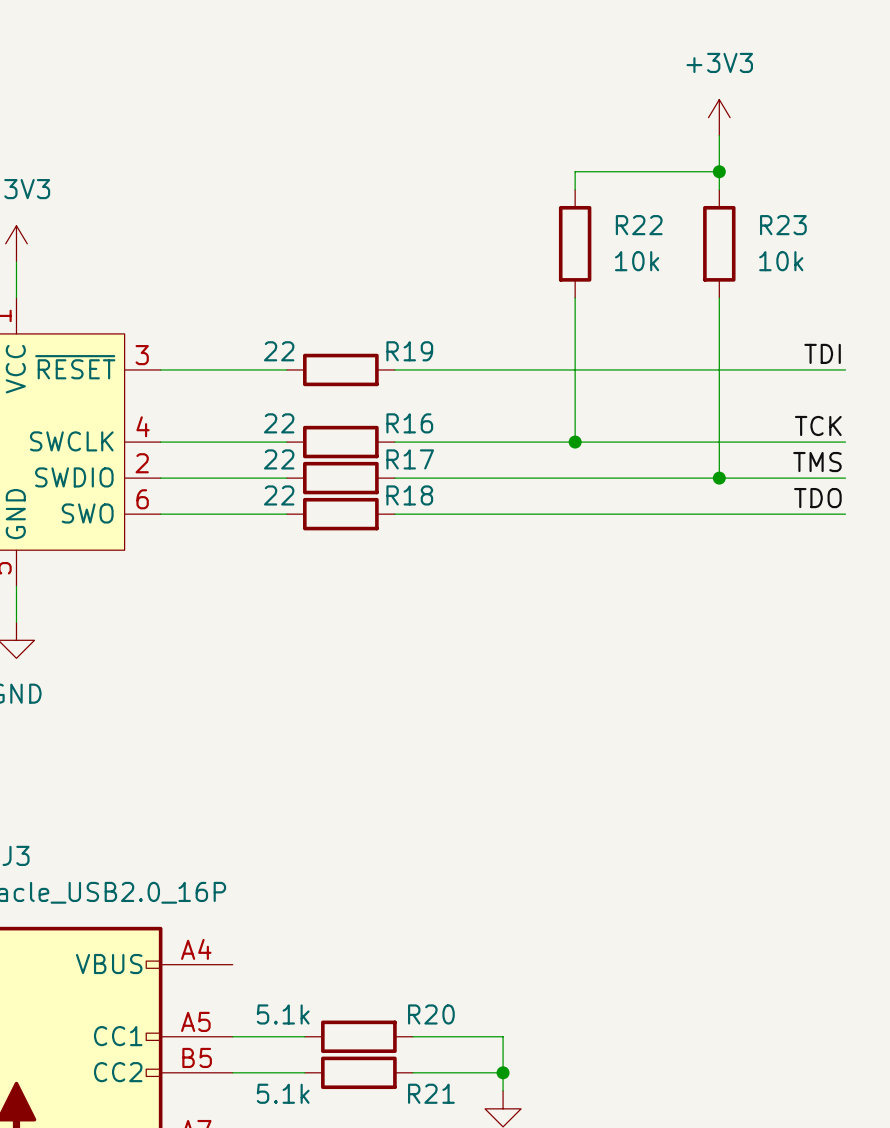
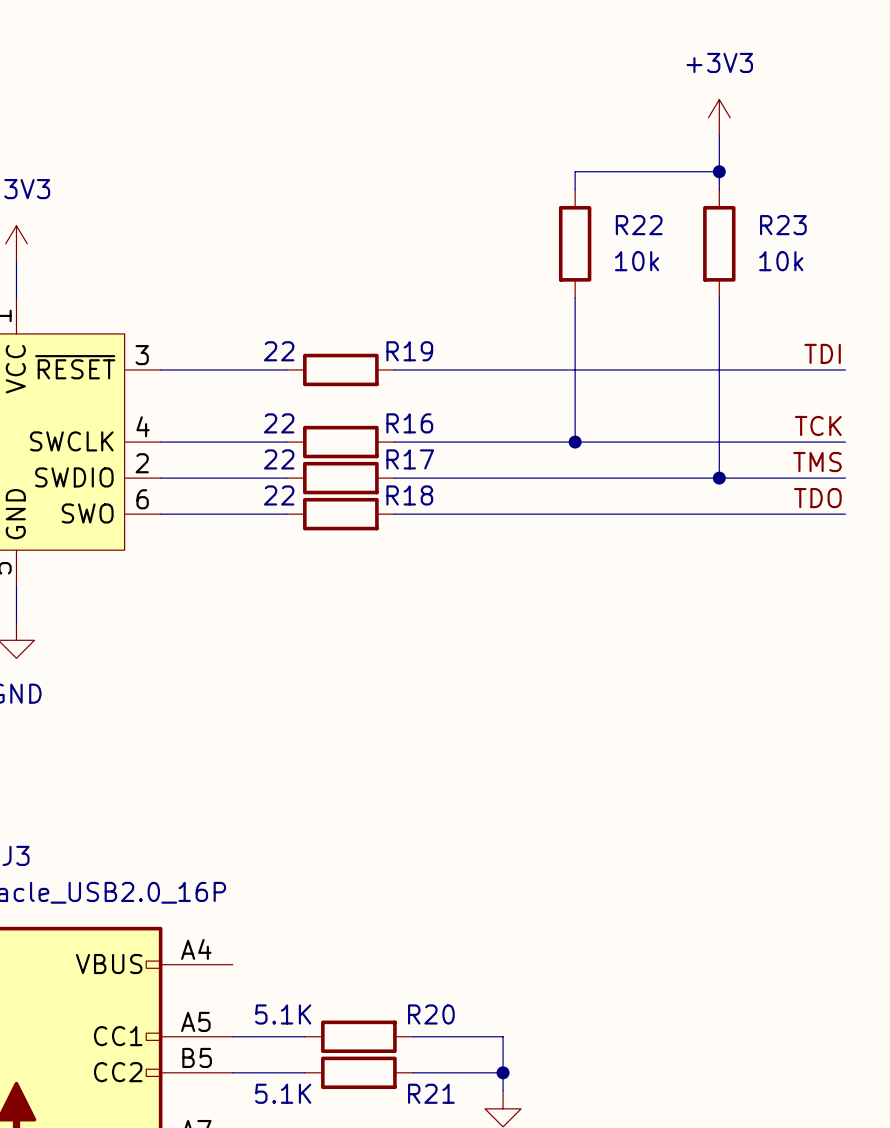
R20 value: 5.1k (283, 1014) -> 5.1K (283, 1014)
R21 value: 5.1k (283, 1093) -> 5.1K (283, 1093)

